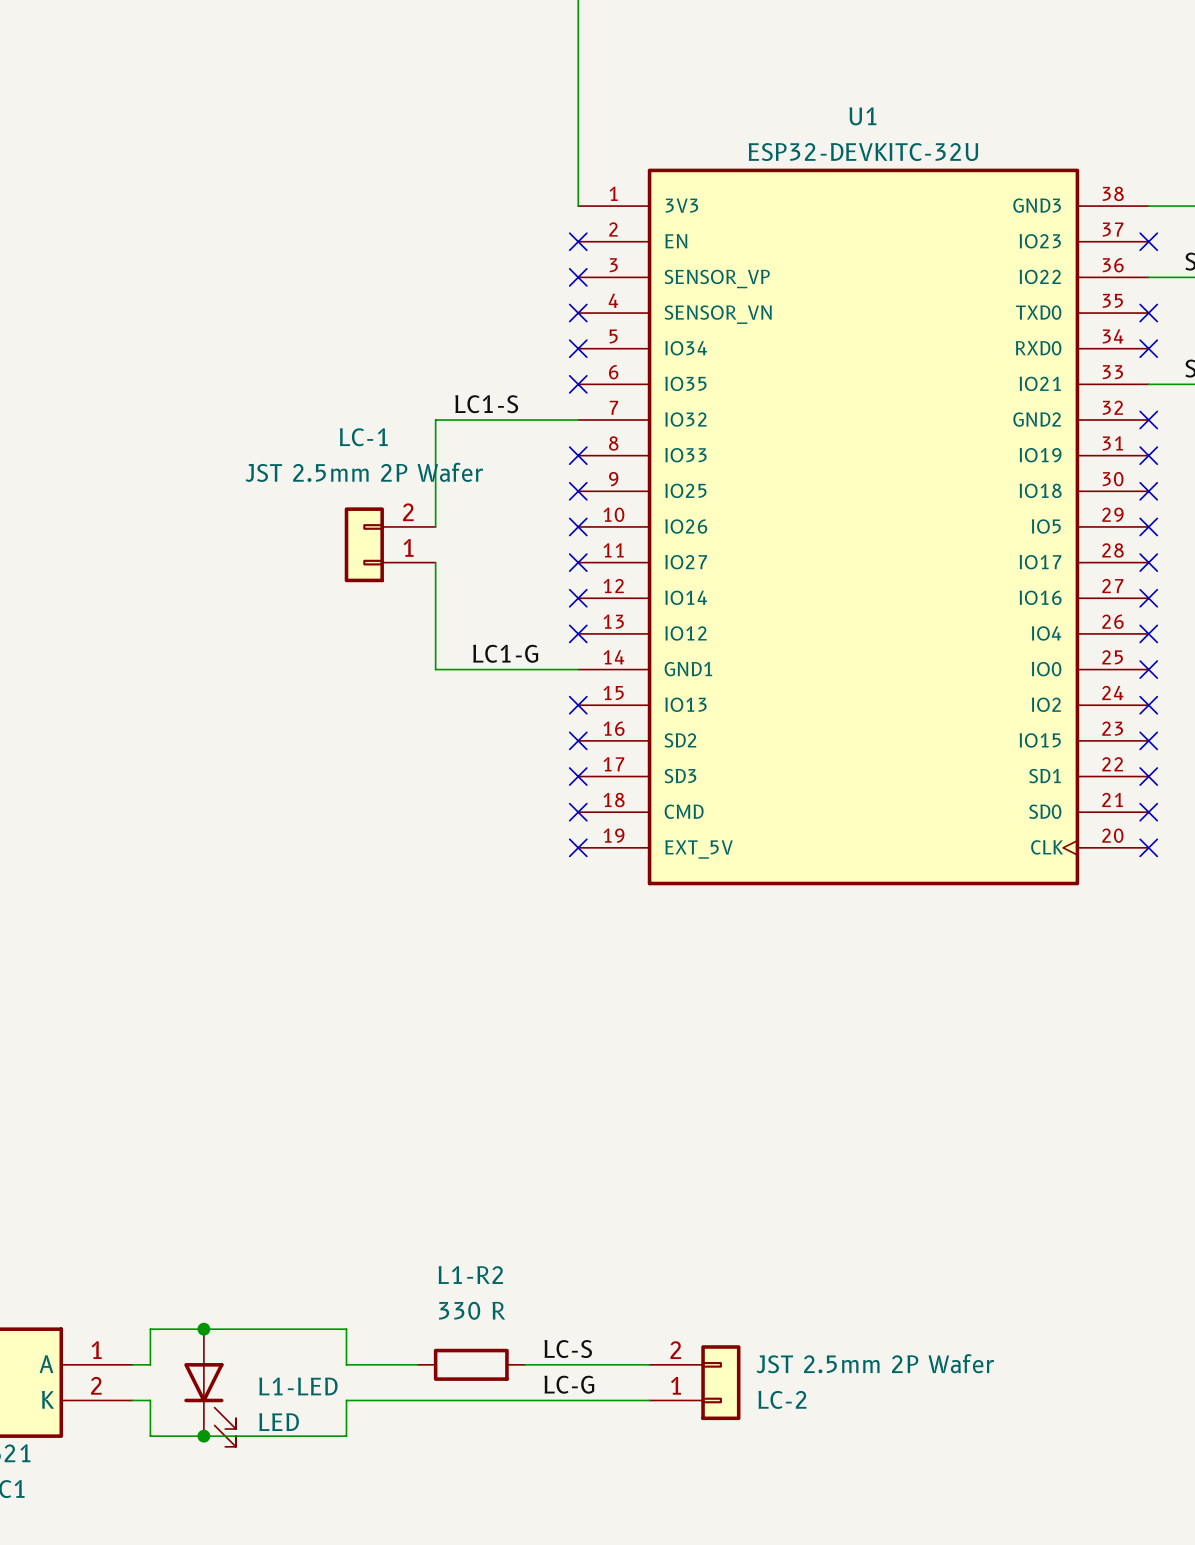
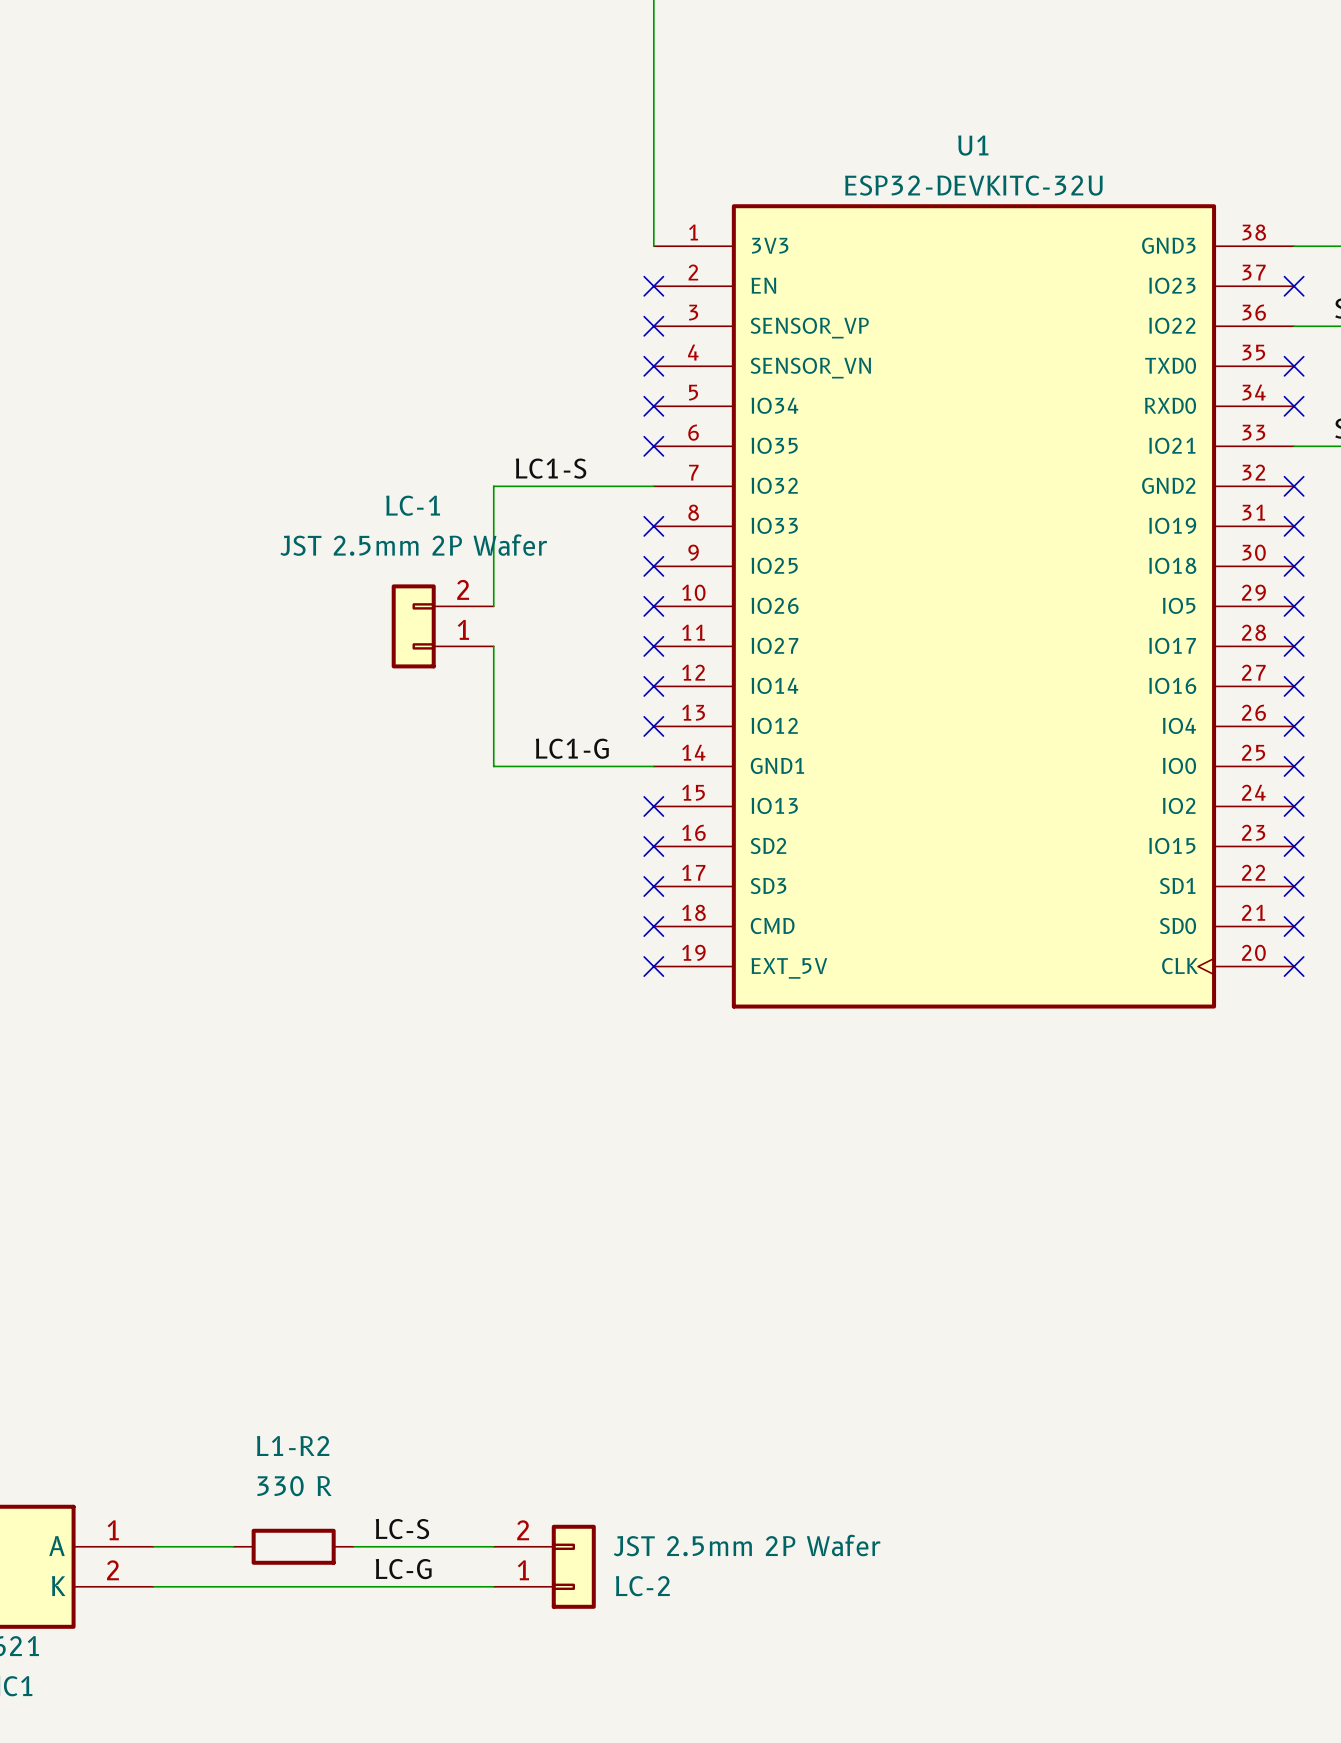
junction: (203, 1329) -> none
label position: LC-S (568, 1349) -> LC-S (402, 1529)
wire: (150, 1364) (150, 1329) (346, 1329) (346, 1364) -> (173, 1546) (233, 1546)
wire: none -> (353, 1546) (393, 1546)
L1-R2 position: (471, 1364) -> (293, 1546)
wire: (524, 1364) (649, 1364) -> none
LC-2 position: (695, 1382) -> (544, 1566)
label position: LC-G (569, 1384) -> LC-G (403, 1569)
L1-LED: LED (210, 1388) -> none
wire: (150, 1400) (150, 1436) (346, 1436) (346, 1400) -> (173, 1586) (393, 1586)
wire: (435, 1400) (649, 1400) -> none
junction: (203, 1436) -> none

